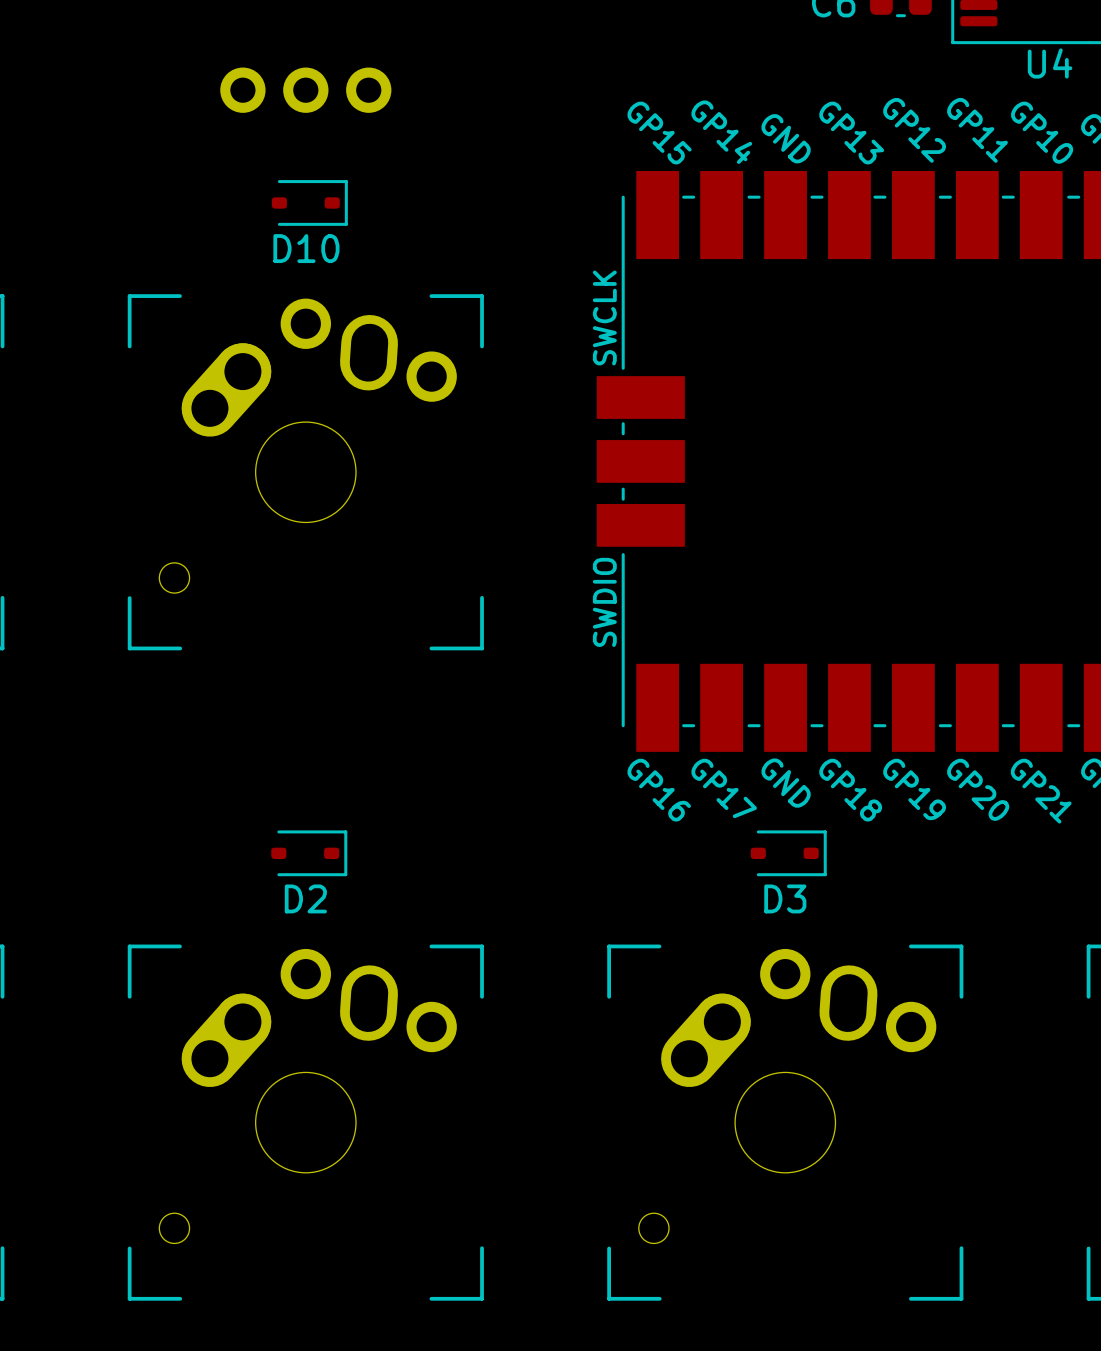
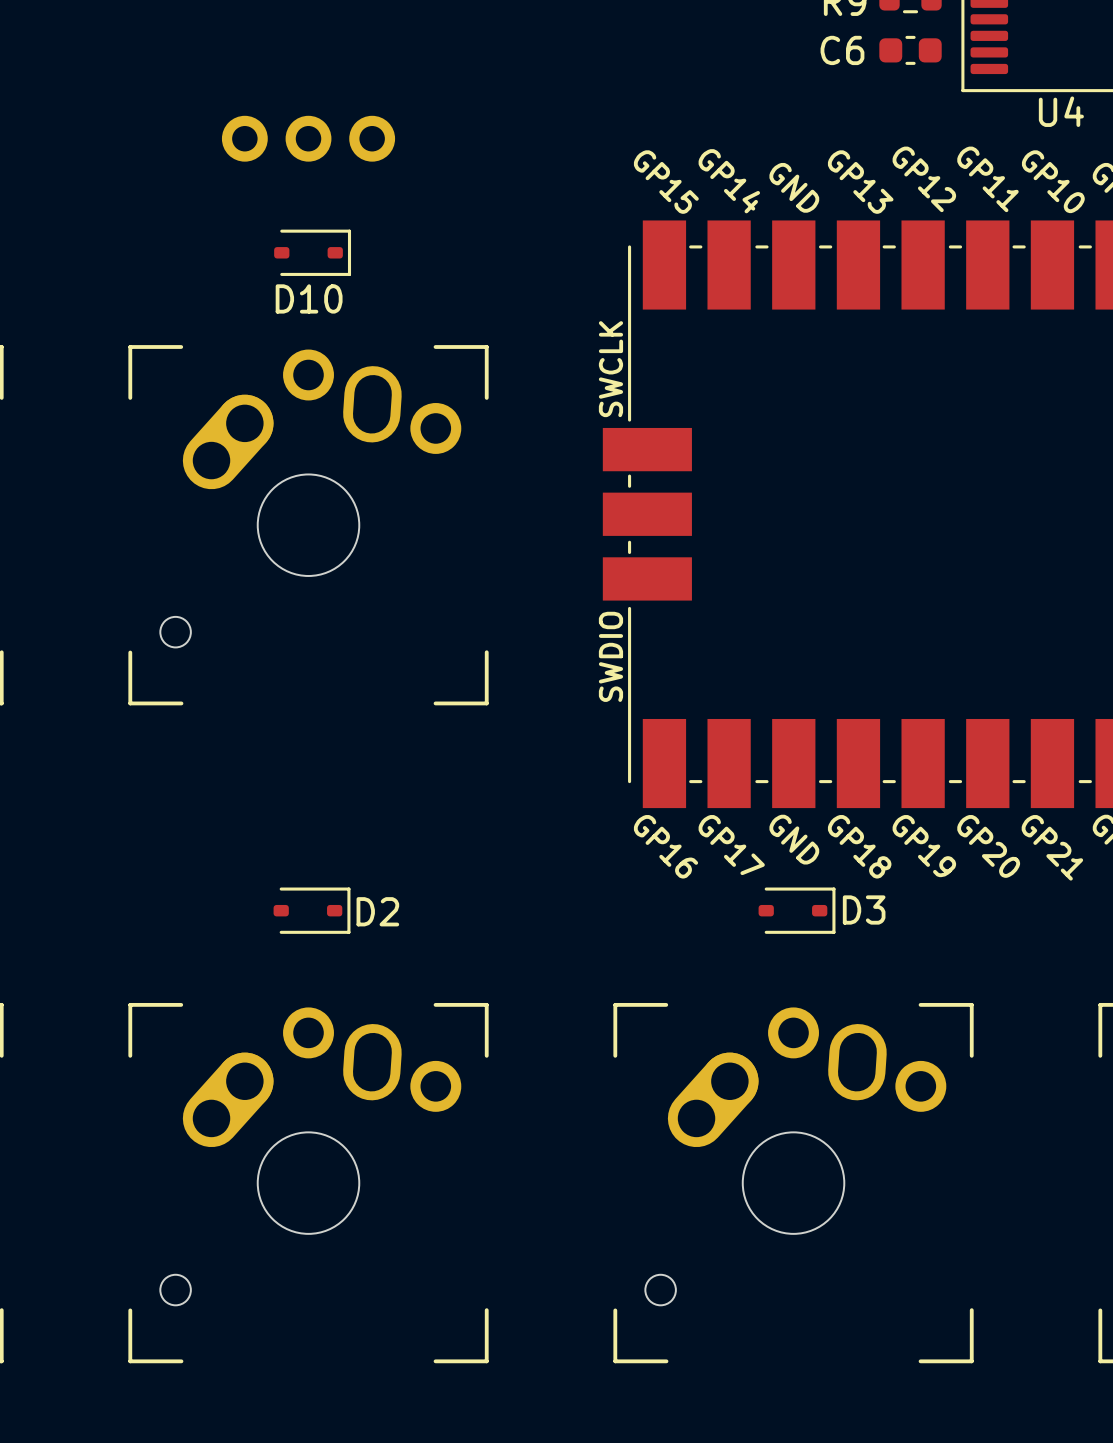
D2 name position: D2 (305, 898) -> D2 (377, 911)
D3 name position: D3 (785, 898) -> D3 (864, 909)

